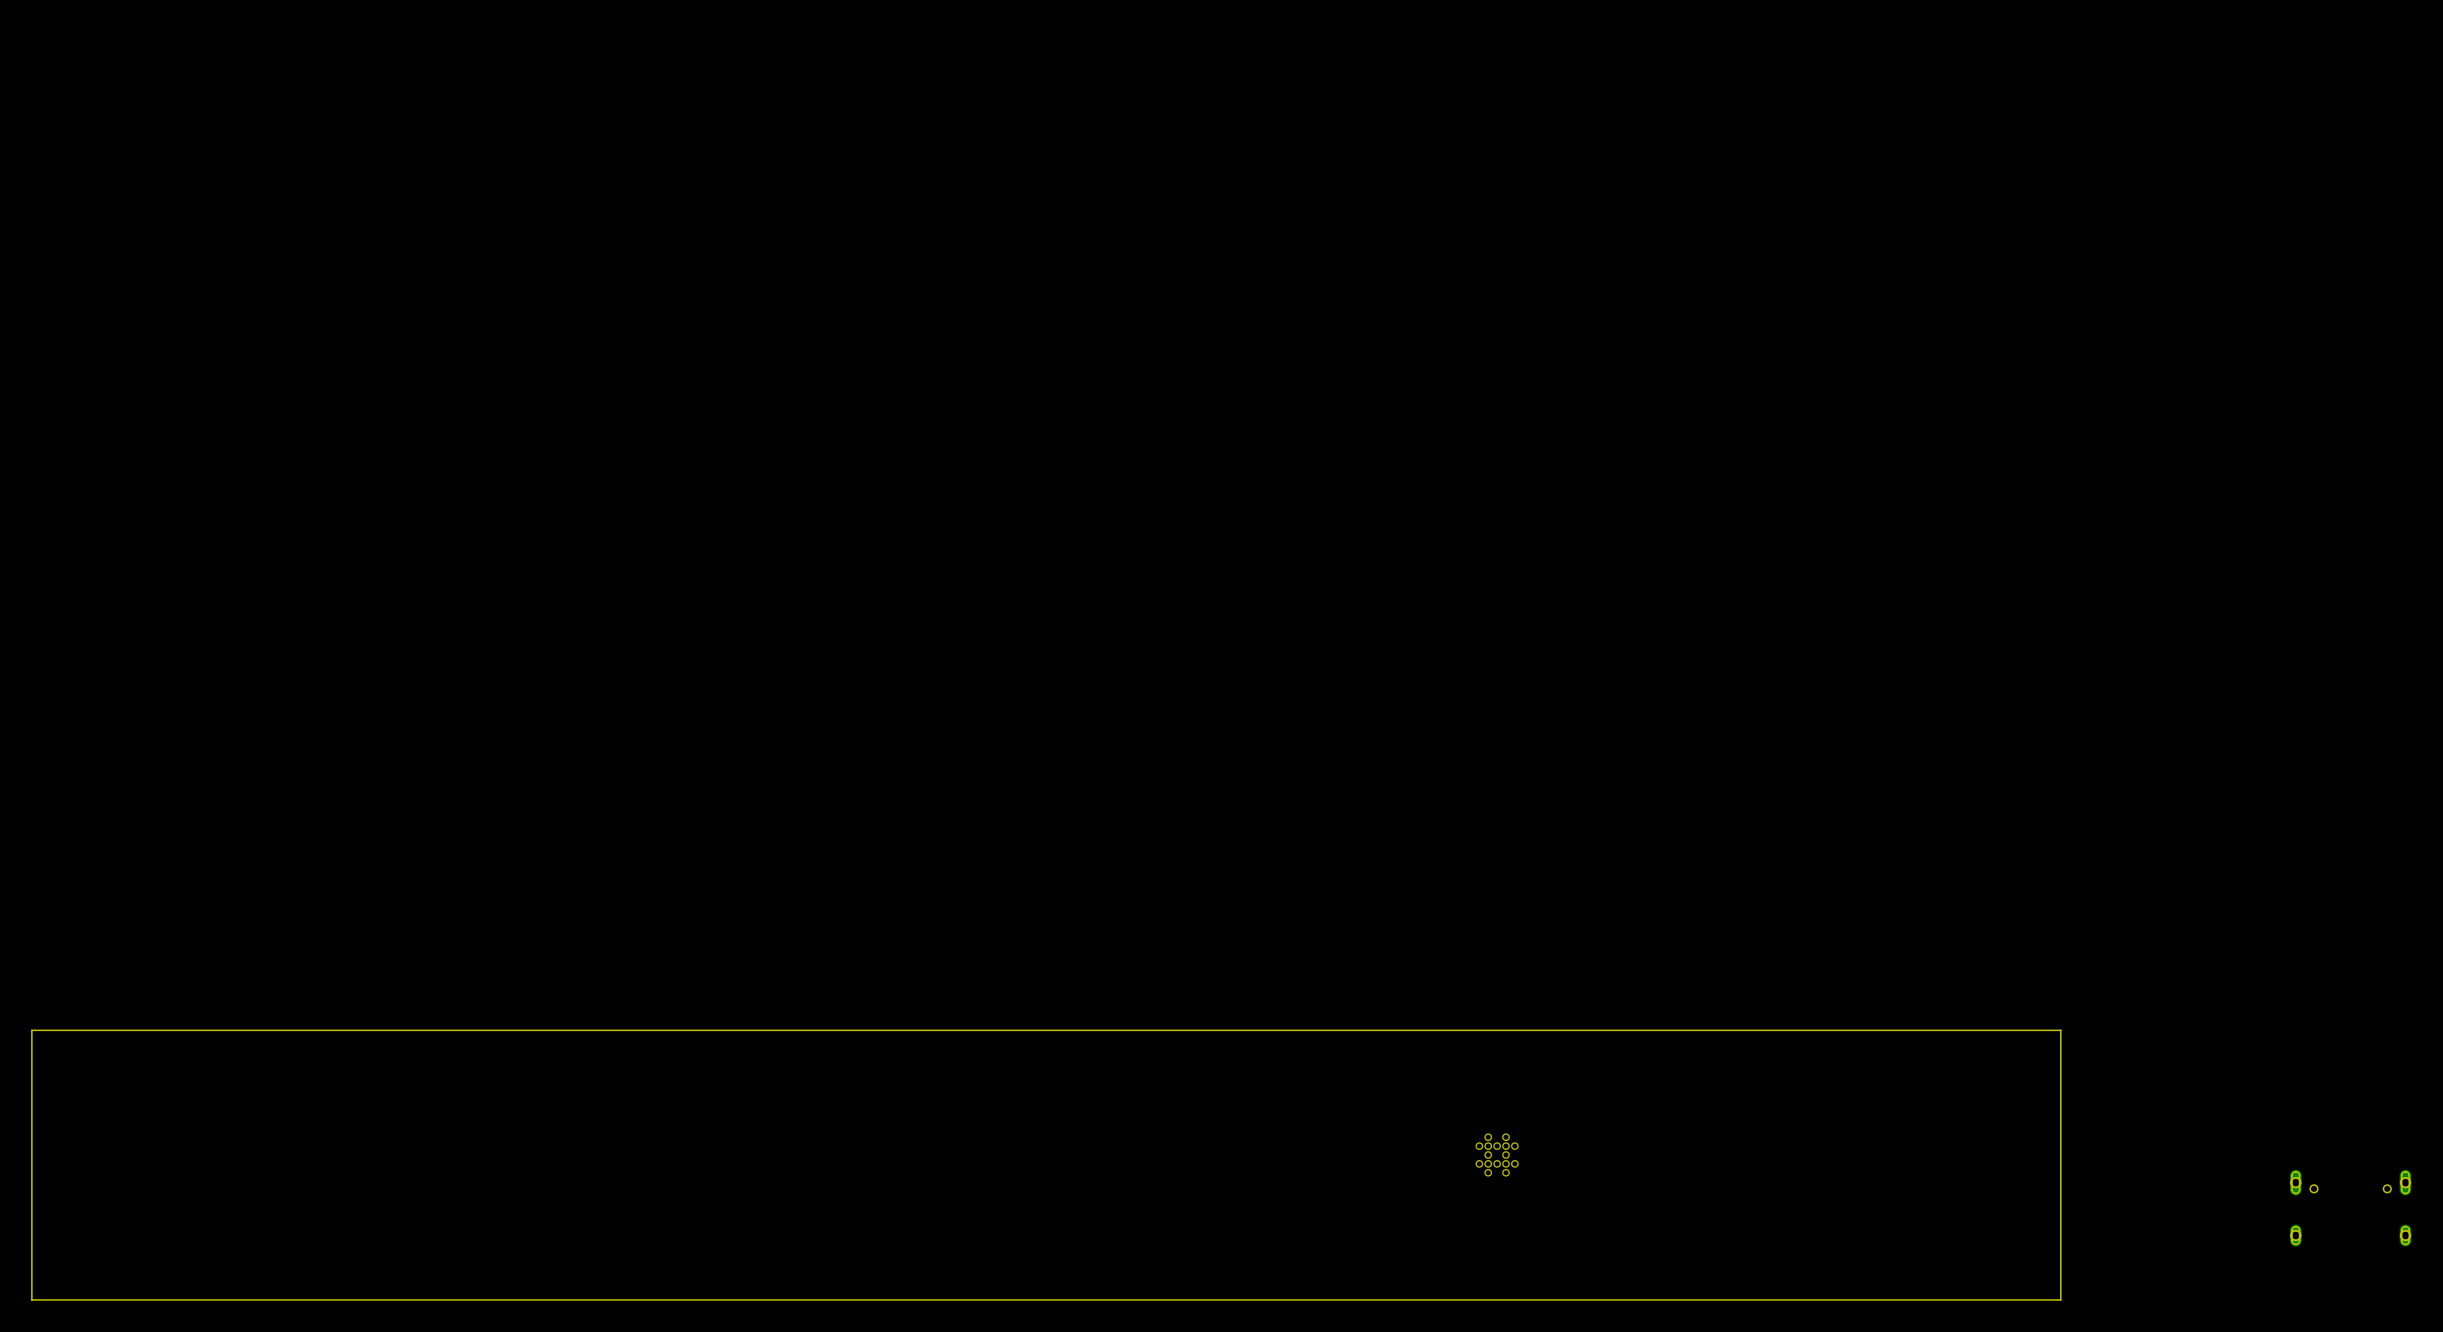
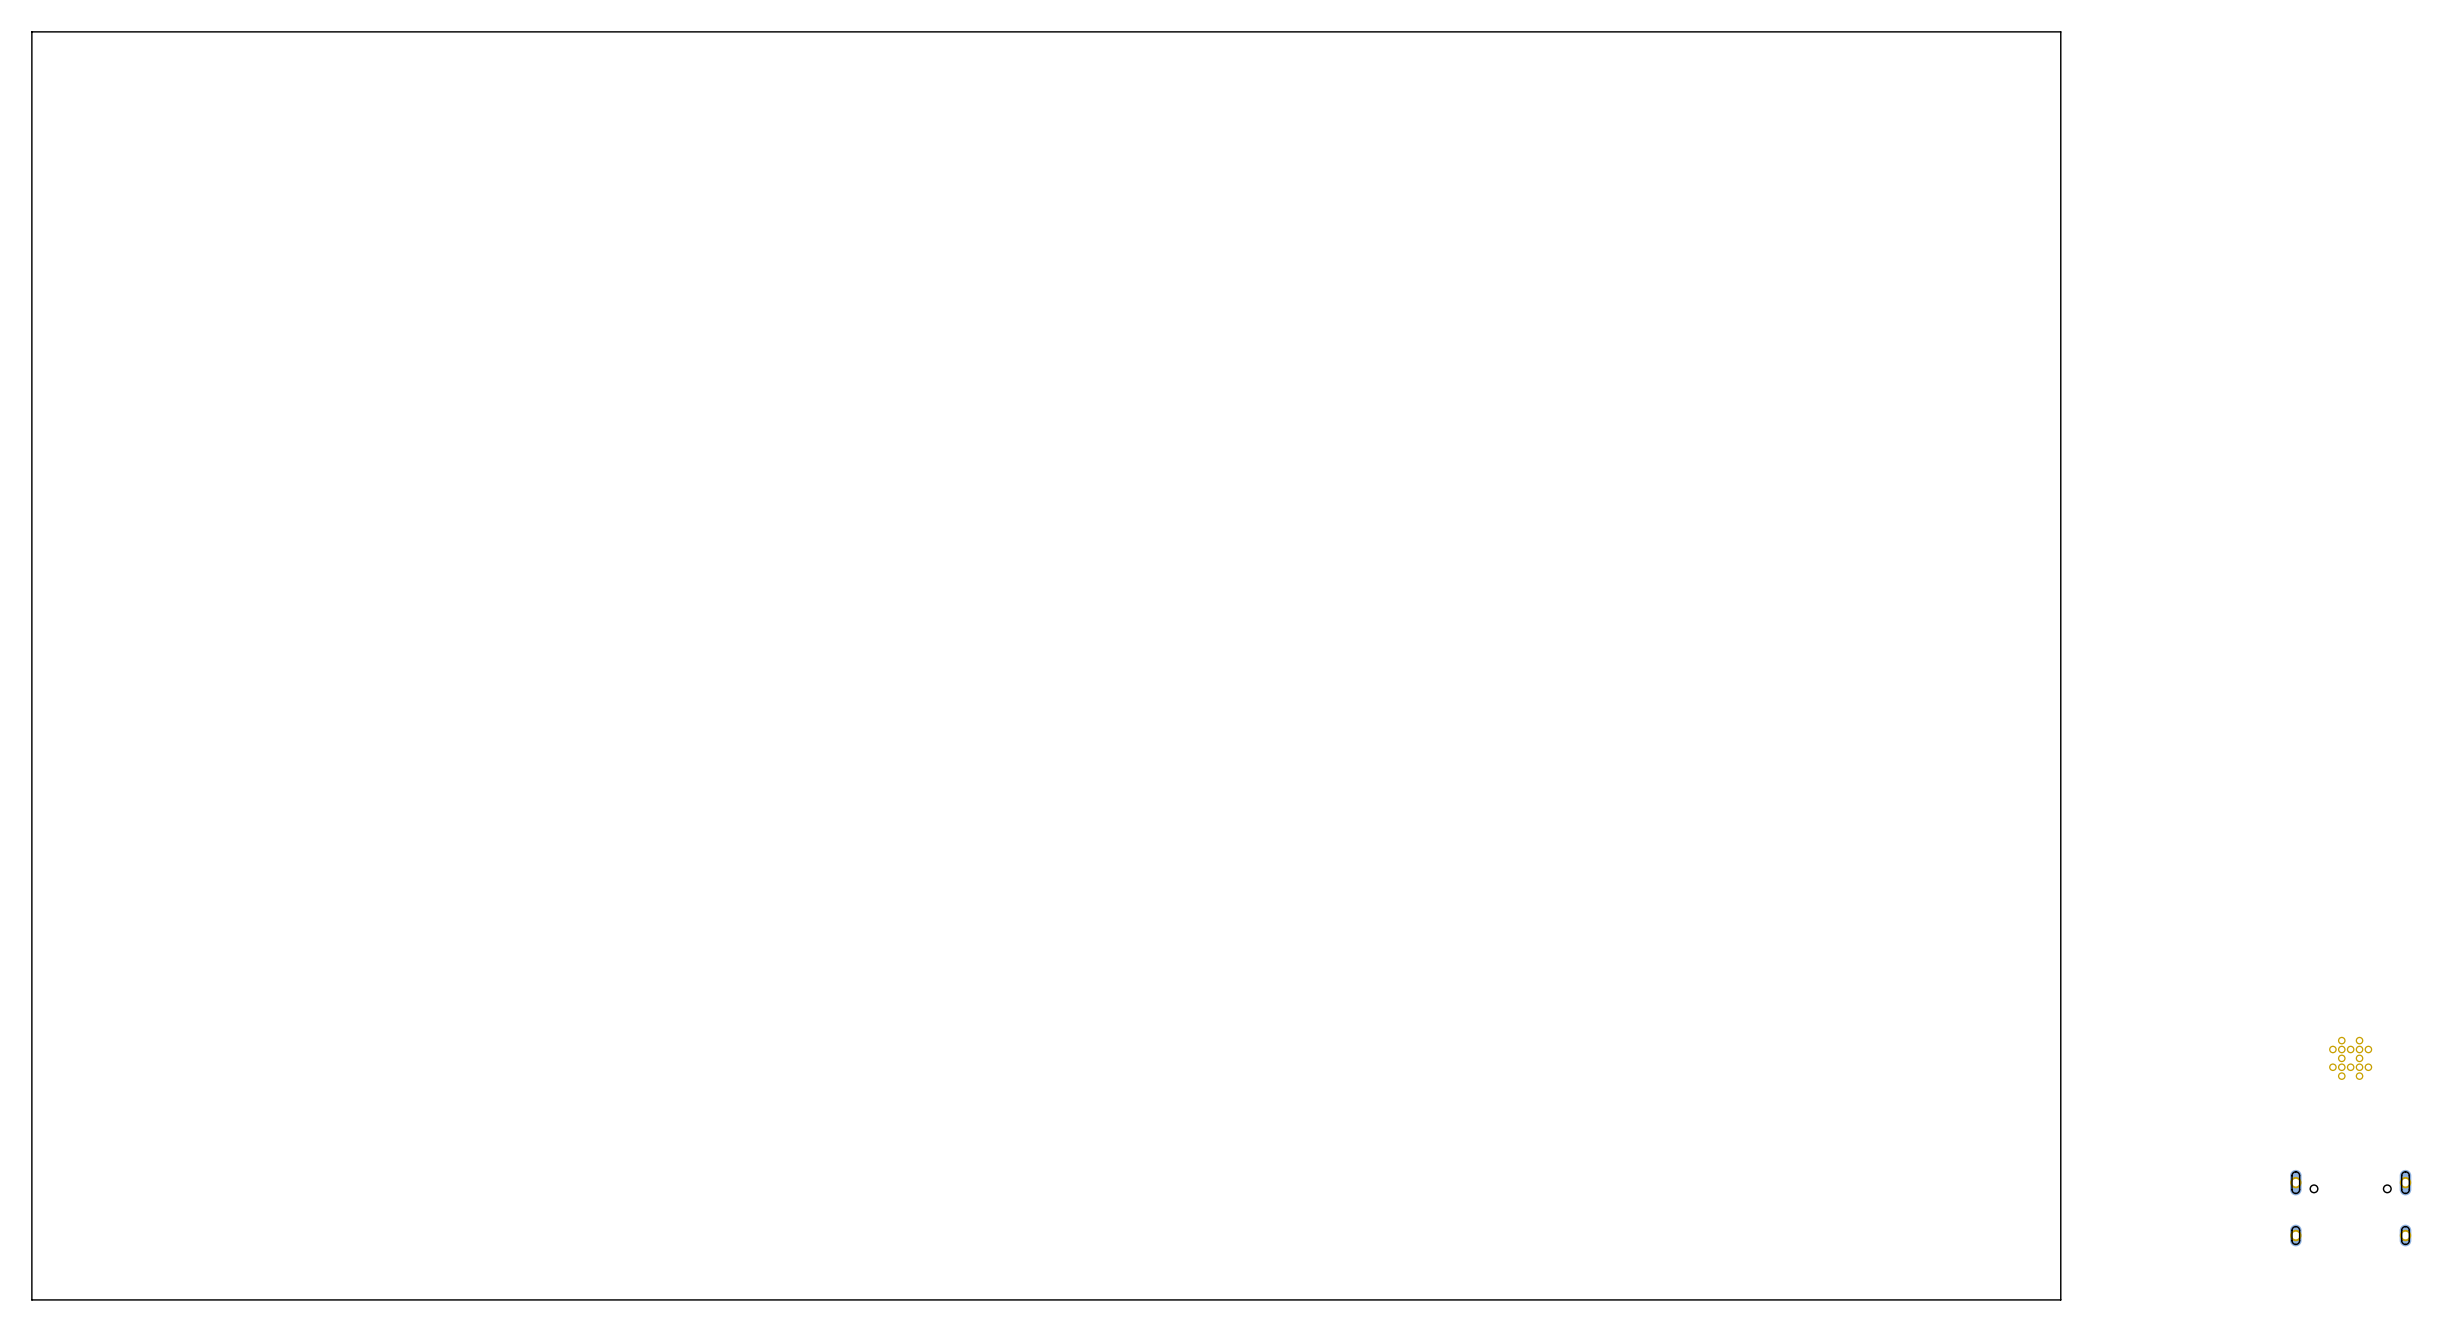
board edge: (2060, 1030) (31, 1030) -> (2060, 1030) (2060, 31) (31, 31) (31, 1030)
part: none -> (2350, 1058)
part: (1497, 1154) -> none

